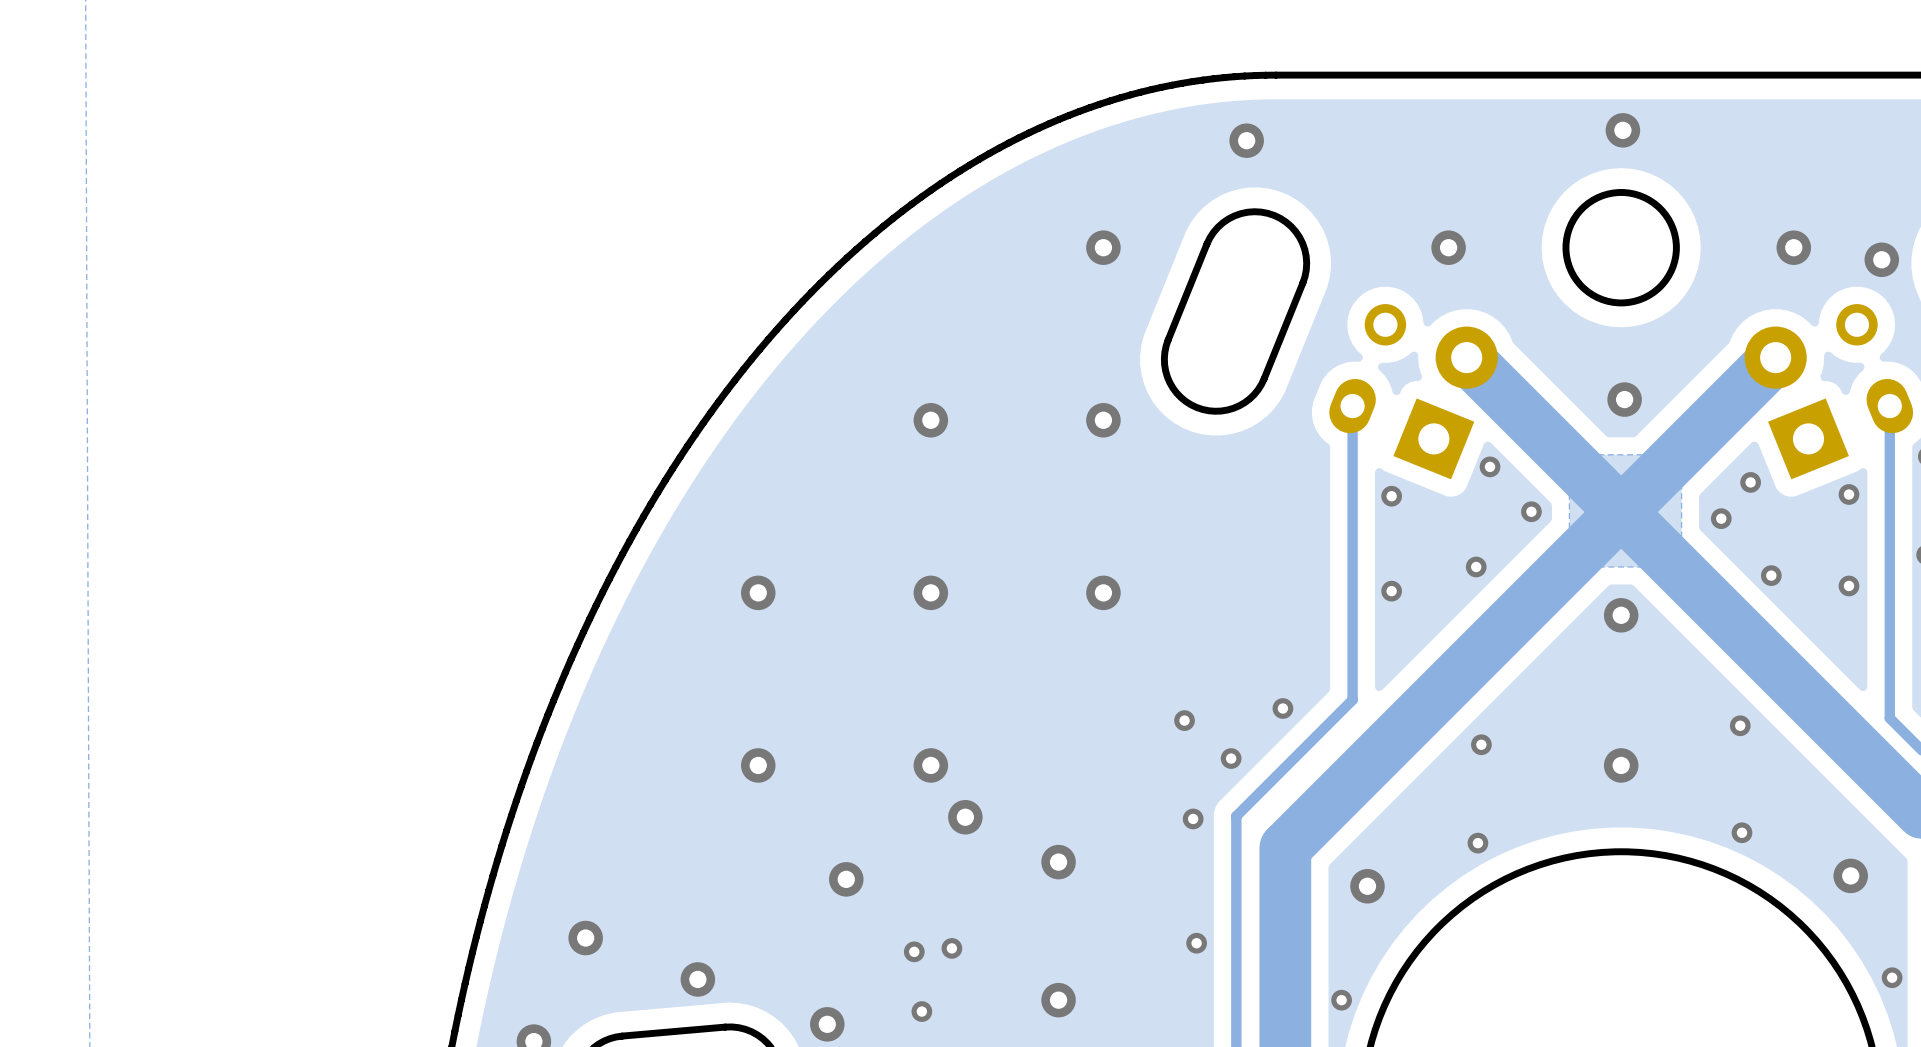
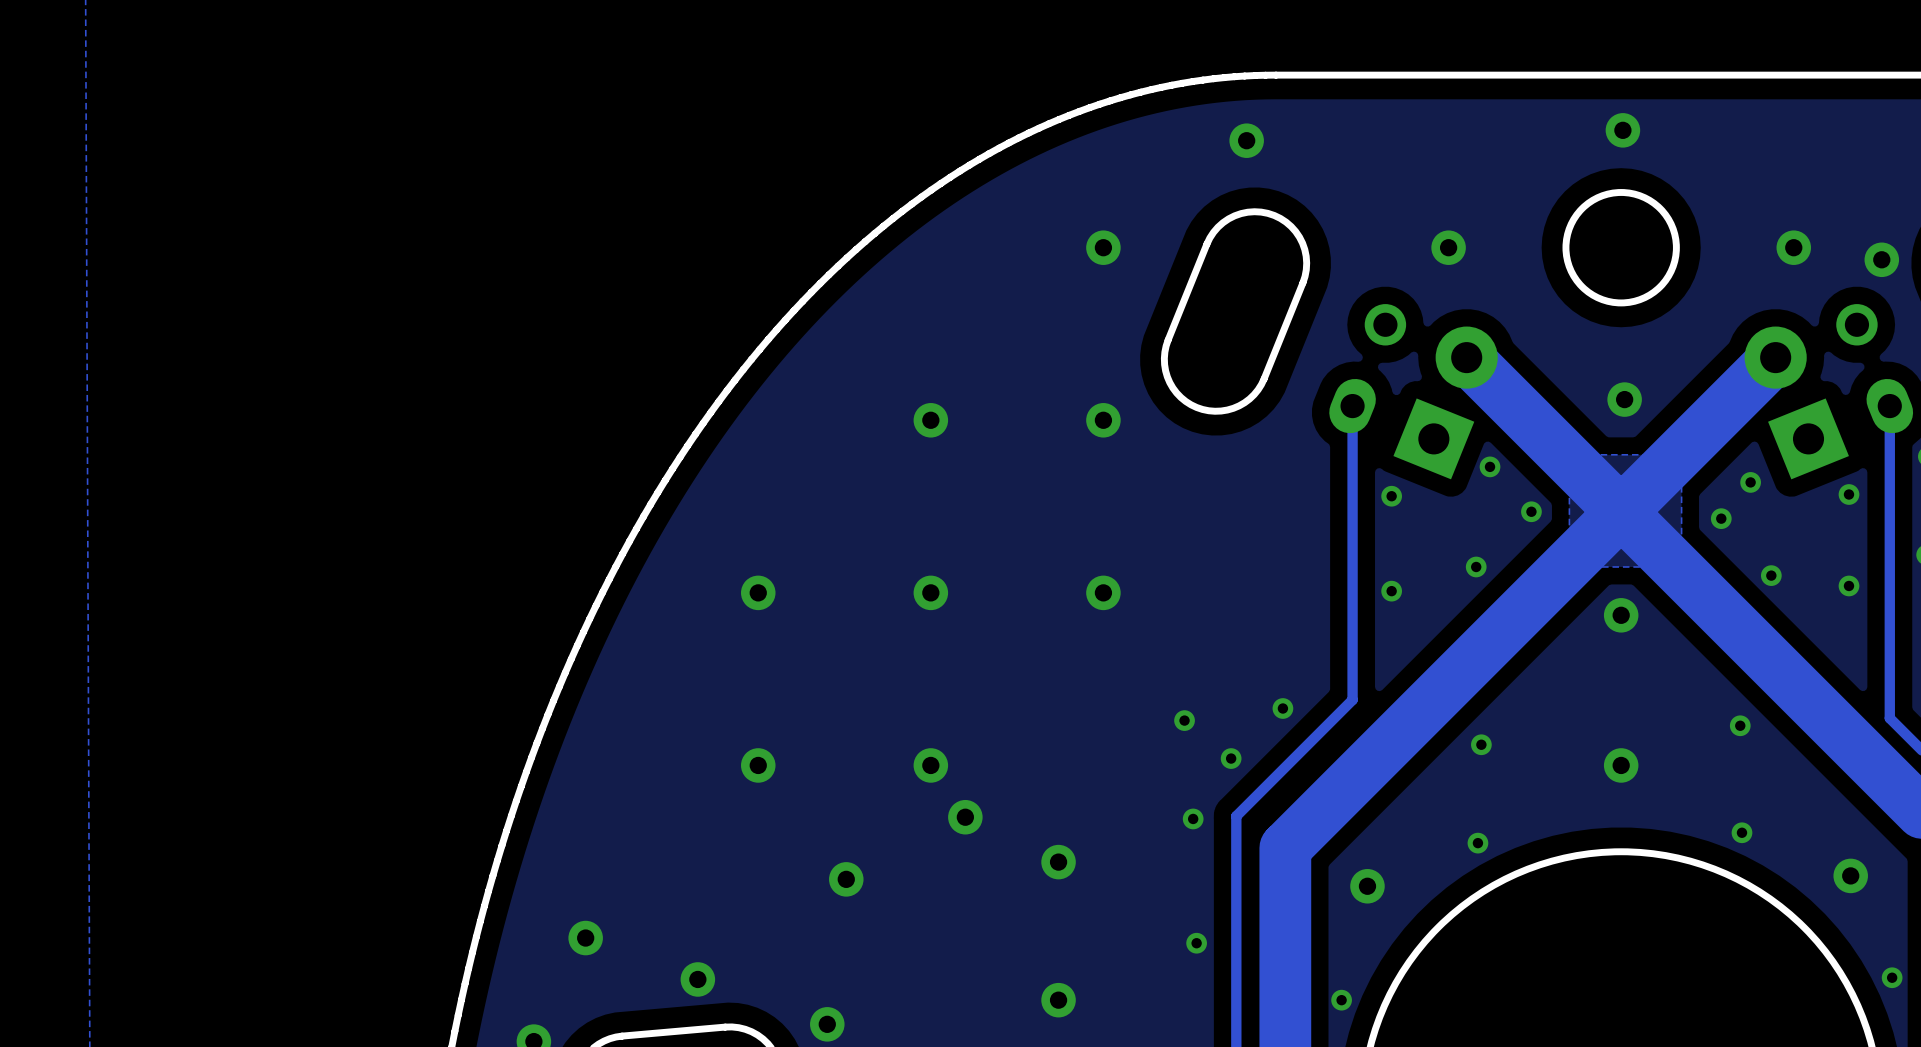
via: (951, 948) -> none
via: (914, 951) -> none
via: (921, 1011) -> none

